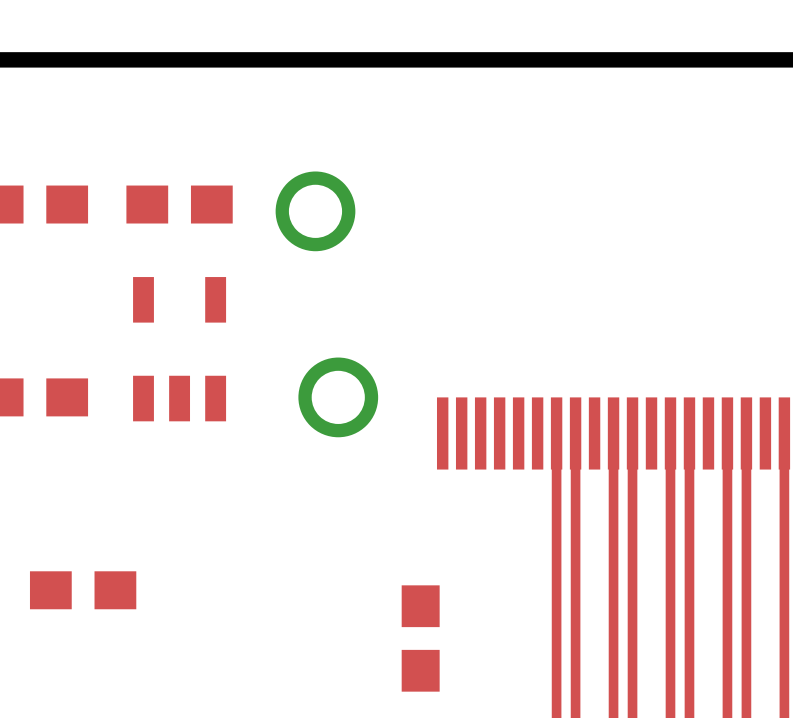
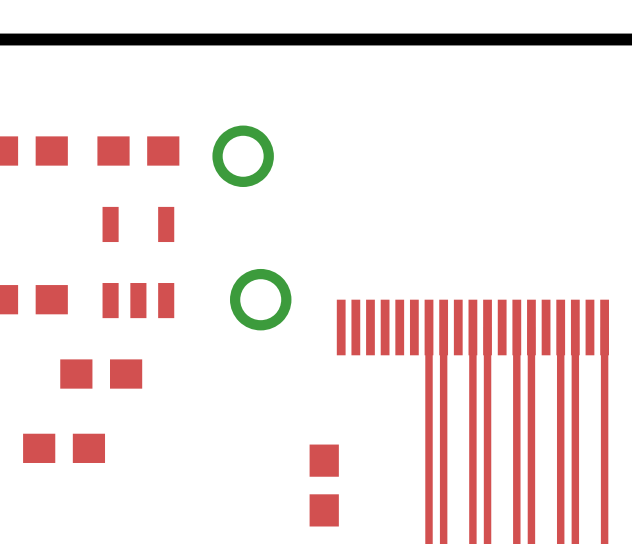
part: none -> (101, 374)

